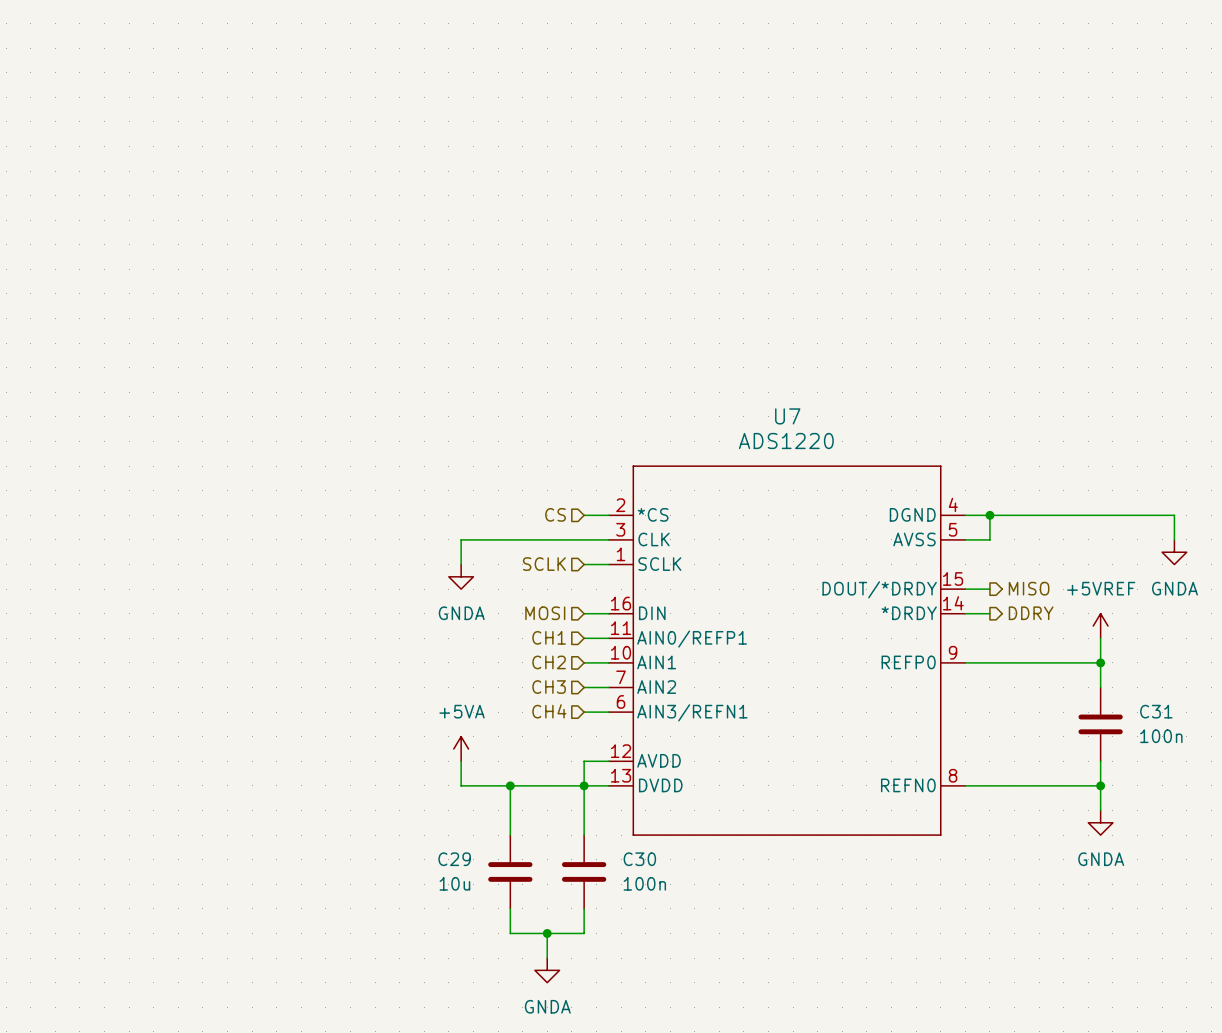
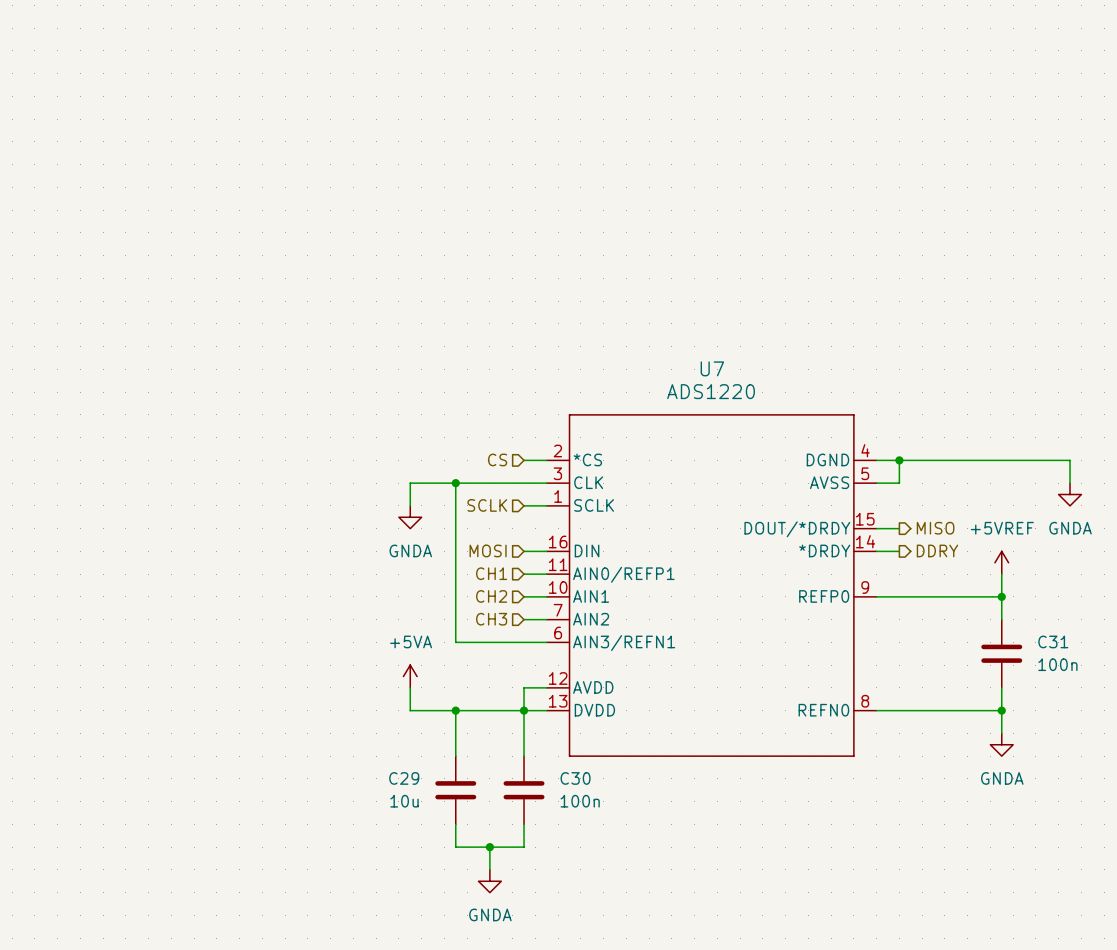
wire: none -> (455, 483) (455, 642) (524, 642)
junction: none -> (455, 483)
hierarchical label: CH4 (549, 711) -> none

